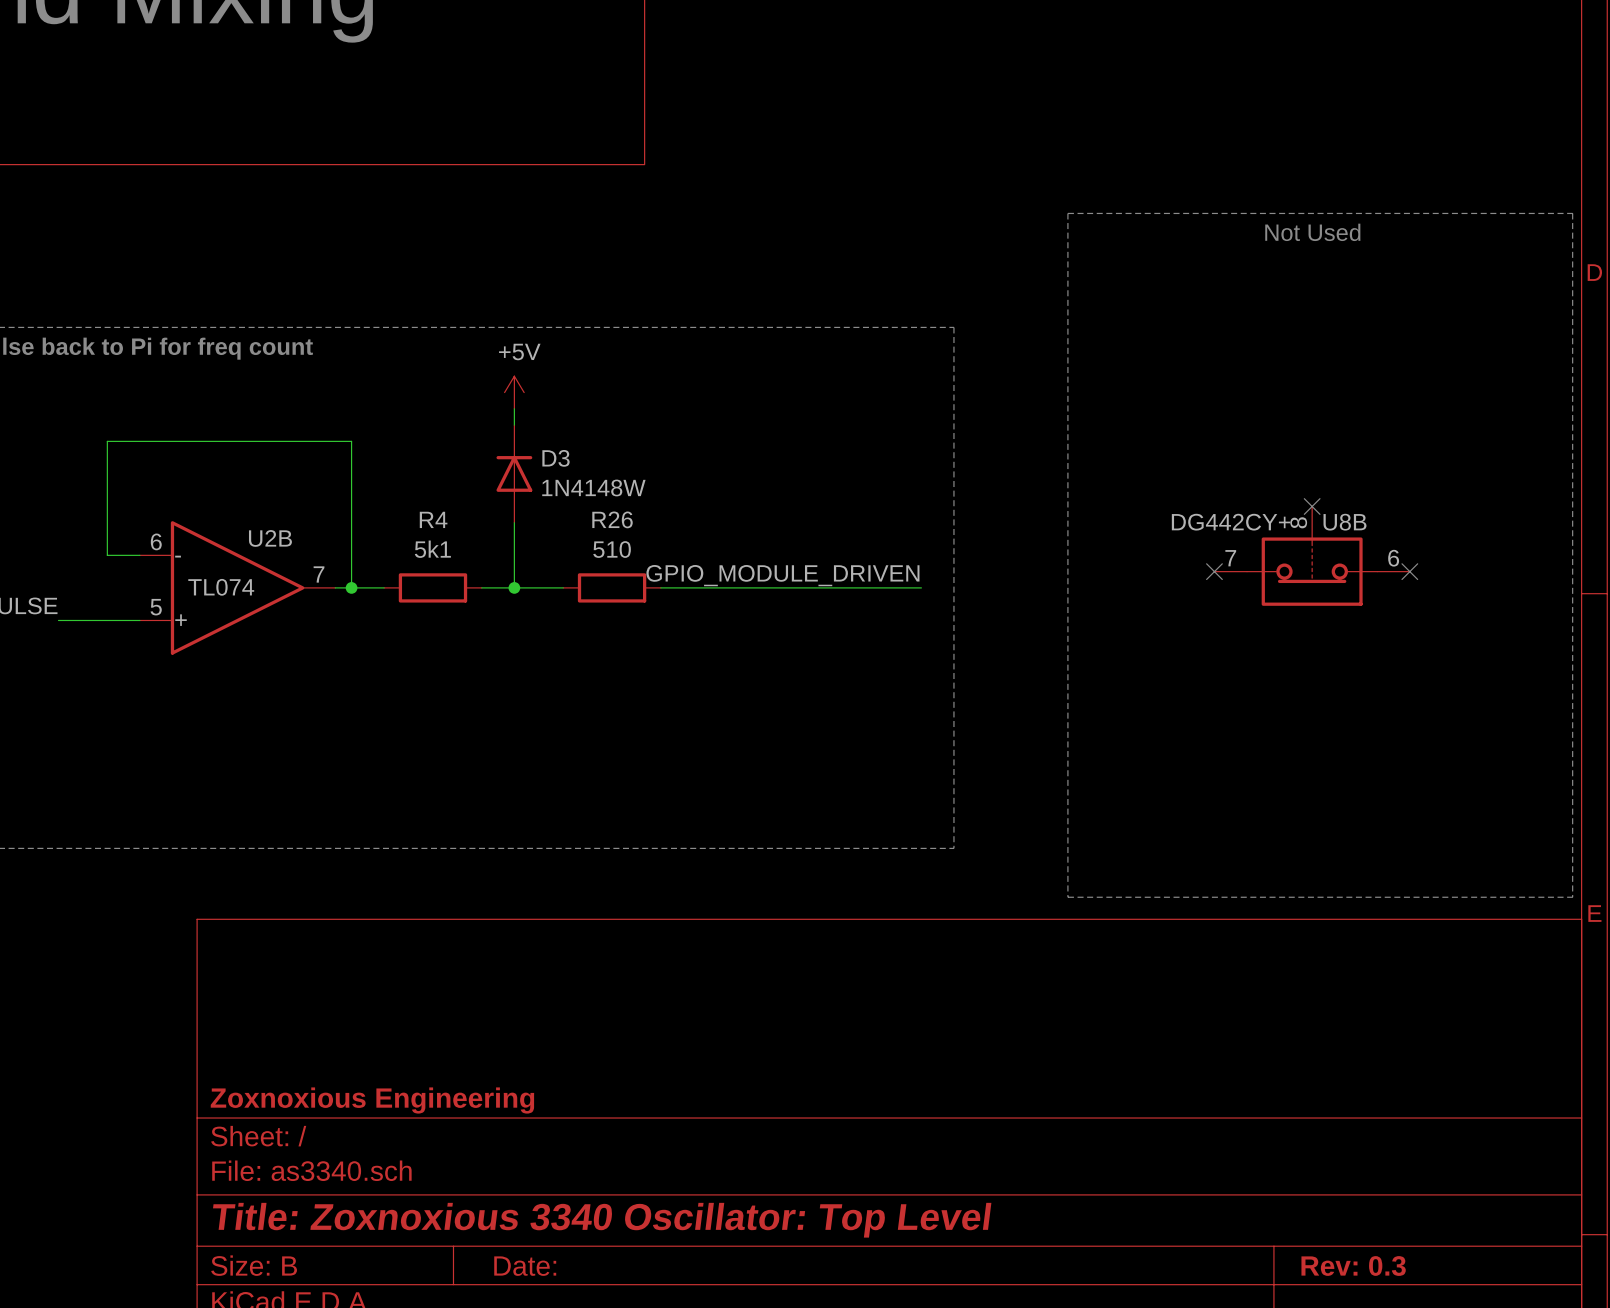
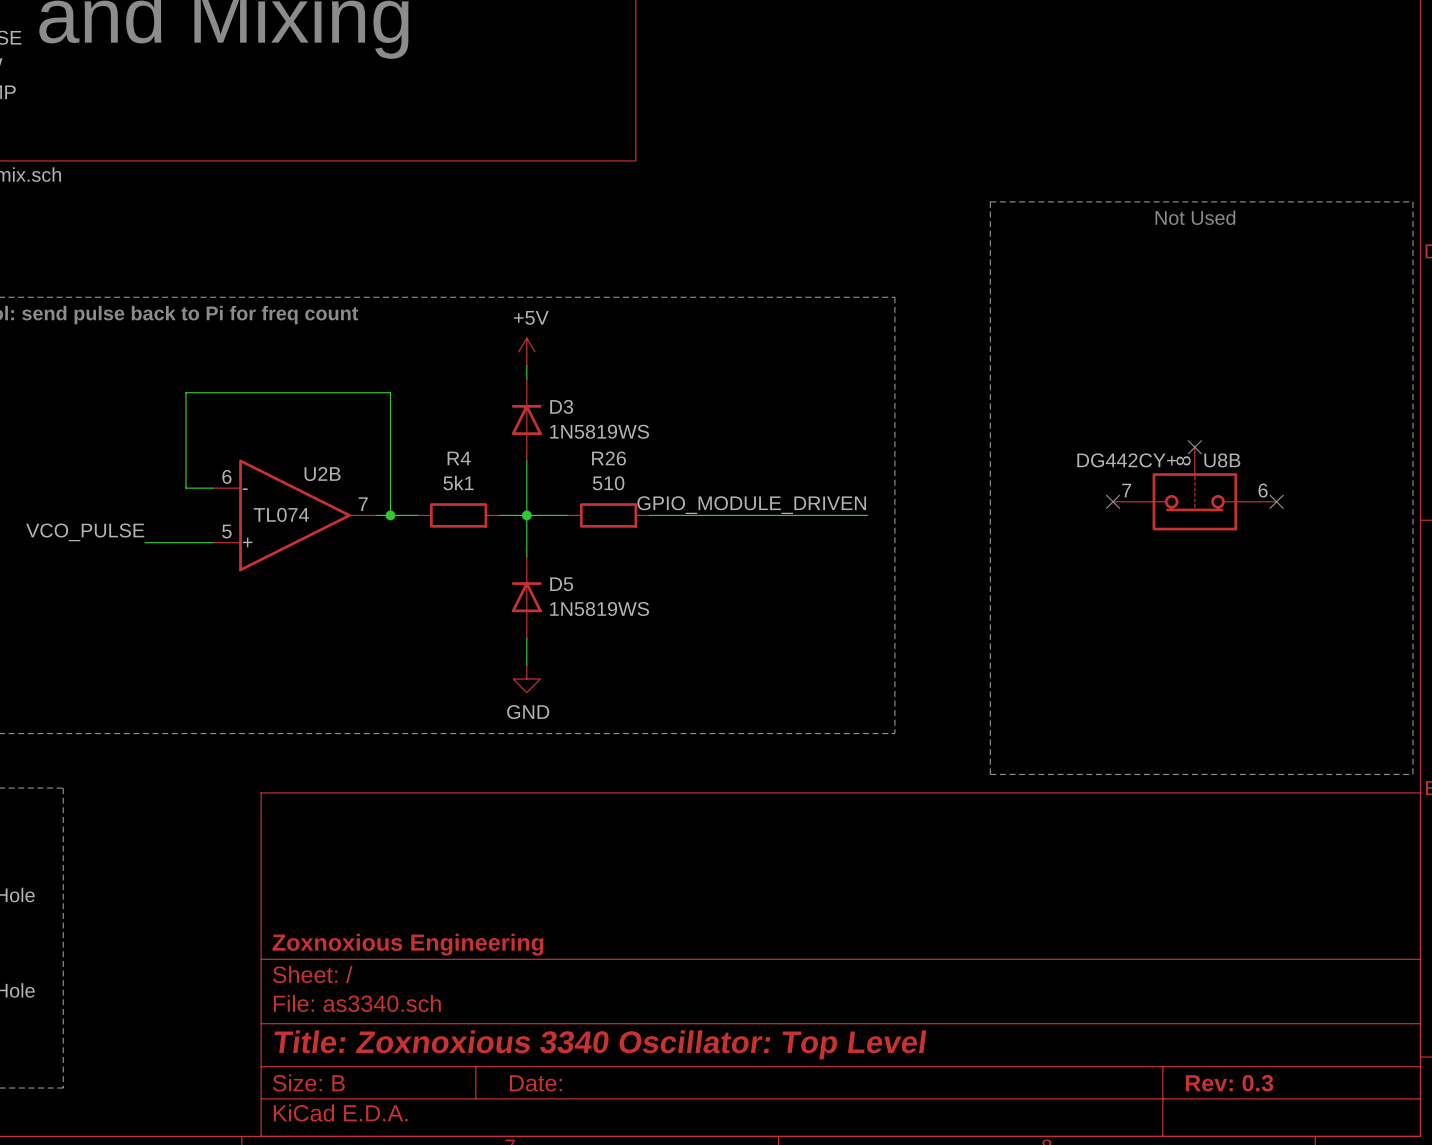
D3 value: 1N4148W (593, 487) -> 1N5819WS (599, 431)
wire: none -> (526, 515) (526, 556)
D5: none -> 1N5819WS (526, 597)
wire: none -> (526, 638) (526, 665)
power symbol: none -> GND (526, 679)

